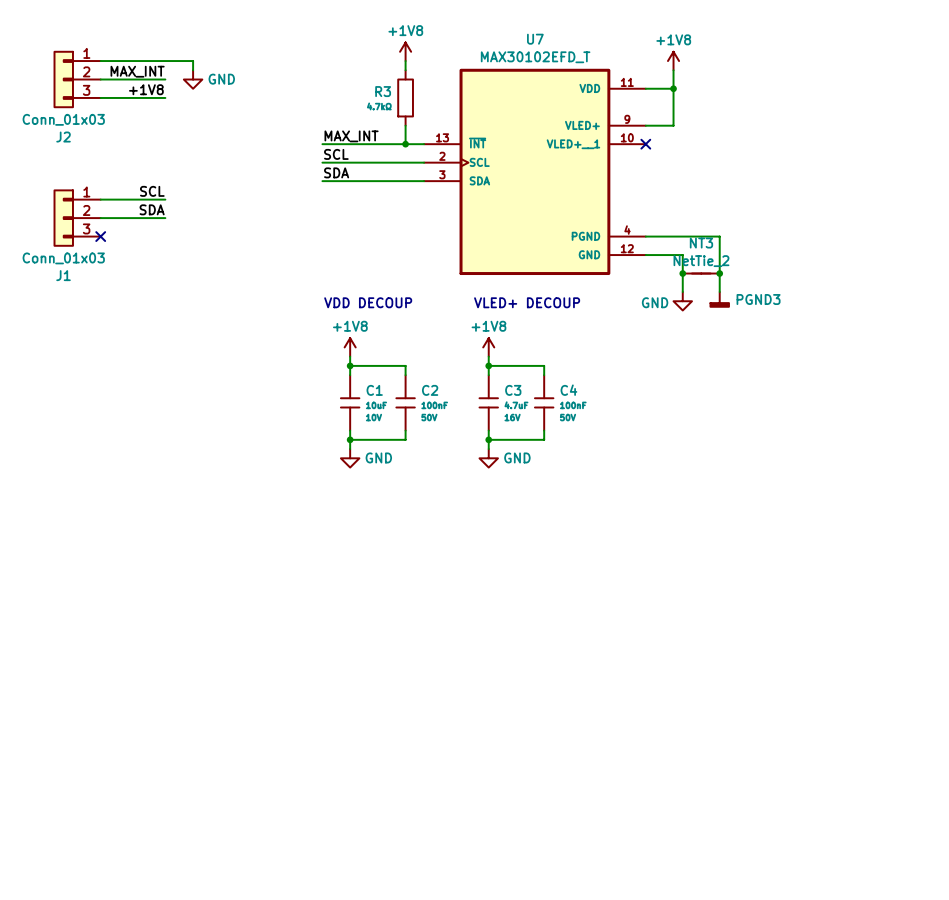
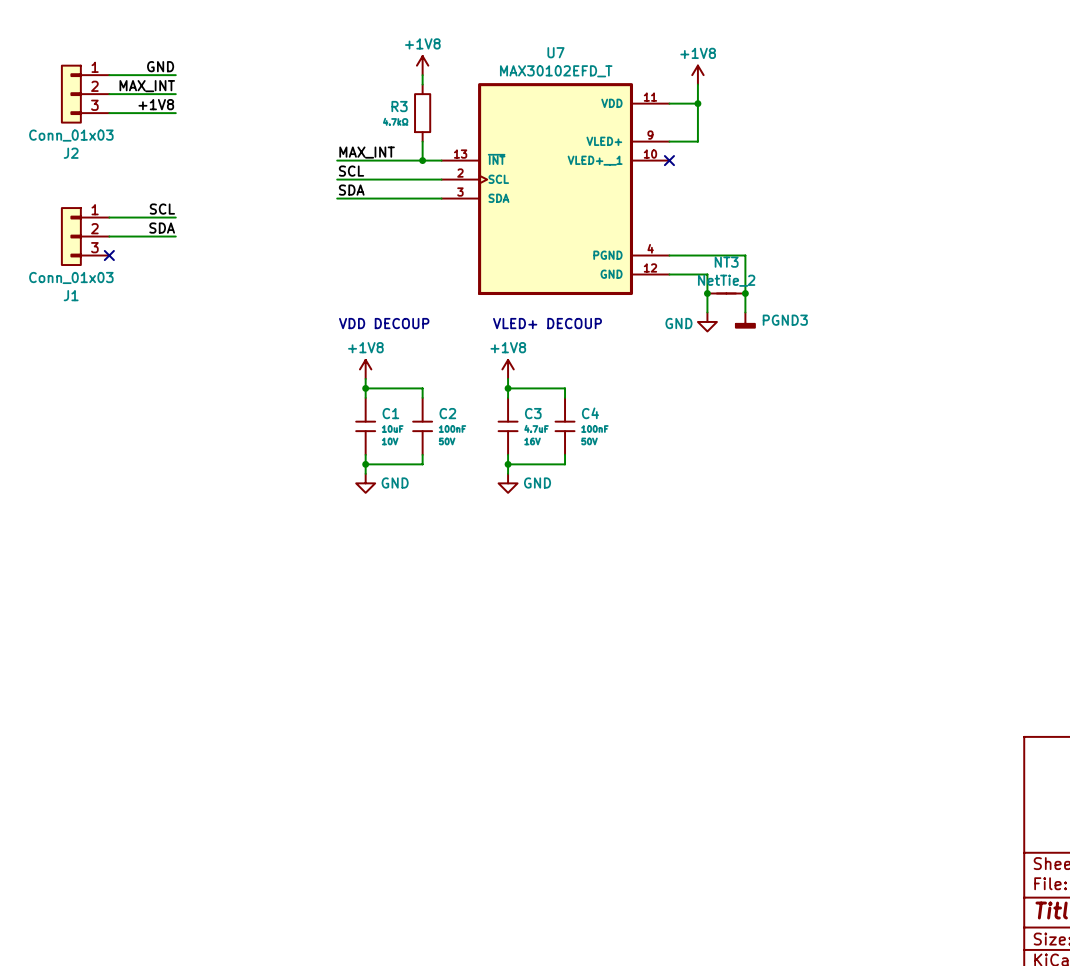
label: none -> GND (160, 66)
wire: (165, 61) (193, 61) (193, 70) -> none
power symbol: GND (193, 79) -> none

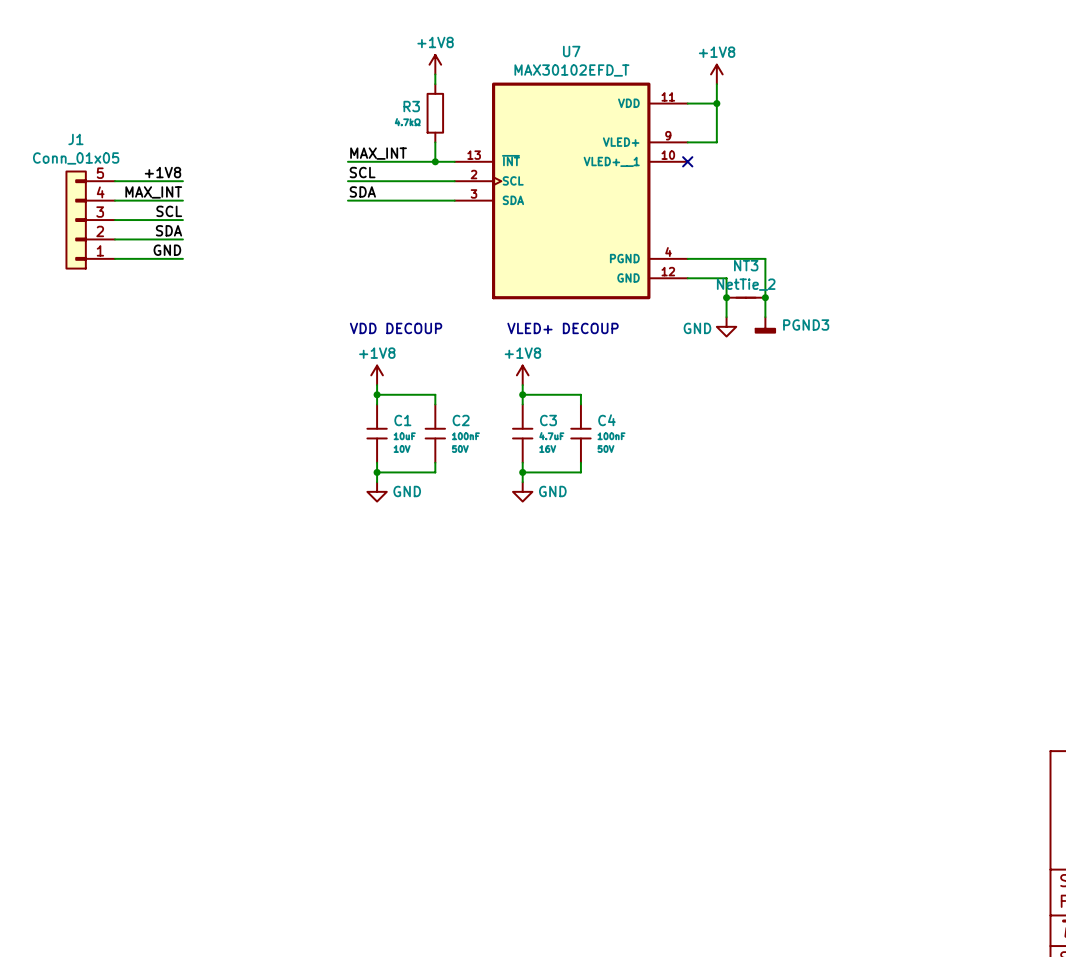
label position: GND (160, 66) -> GND (167, 250)
wire: (109, 75) (175, 75) -> (114, 258) (182, 258)
label position: MAX_INT (147, 86) -> MAX_INT (153, 192)
J2: Conn_01x03 (85, 94) -> none
wire: (109, 94) (175, 94) -> (114, 200) (182, 200)
label position: +1V8 (156, 104) -> +1V8 (162, 172)
wire: (109, 113) (175, 113) -> (114, 181) (182, 181)
J1 symbol: [60, 207, 110, 266] -> [65, 170, 115, 270]
no-connect mark: (109, 255) -> none
J1 value: Conn_01x03 (71, 277) -> Conn_01x05 (76, 158)
J1 name position: J1 (71, 295) -> J1 (75, 139)

